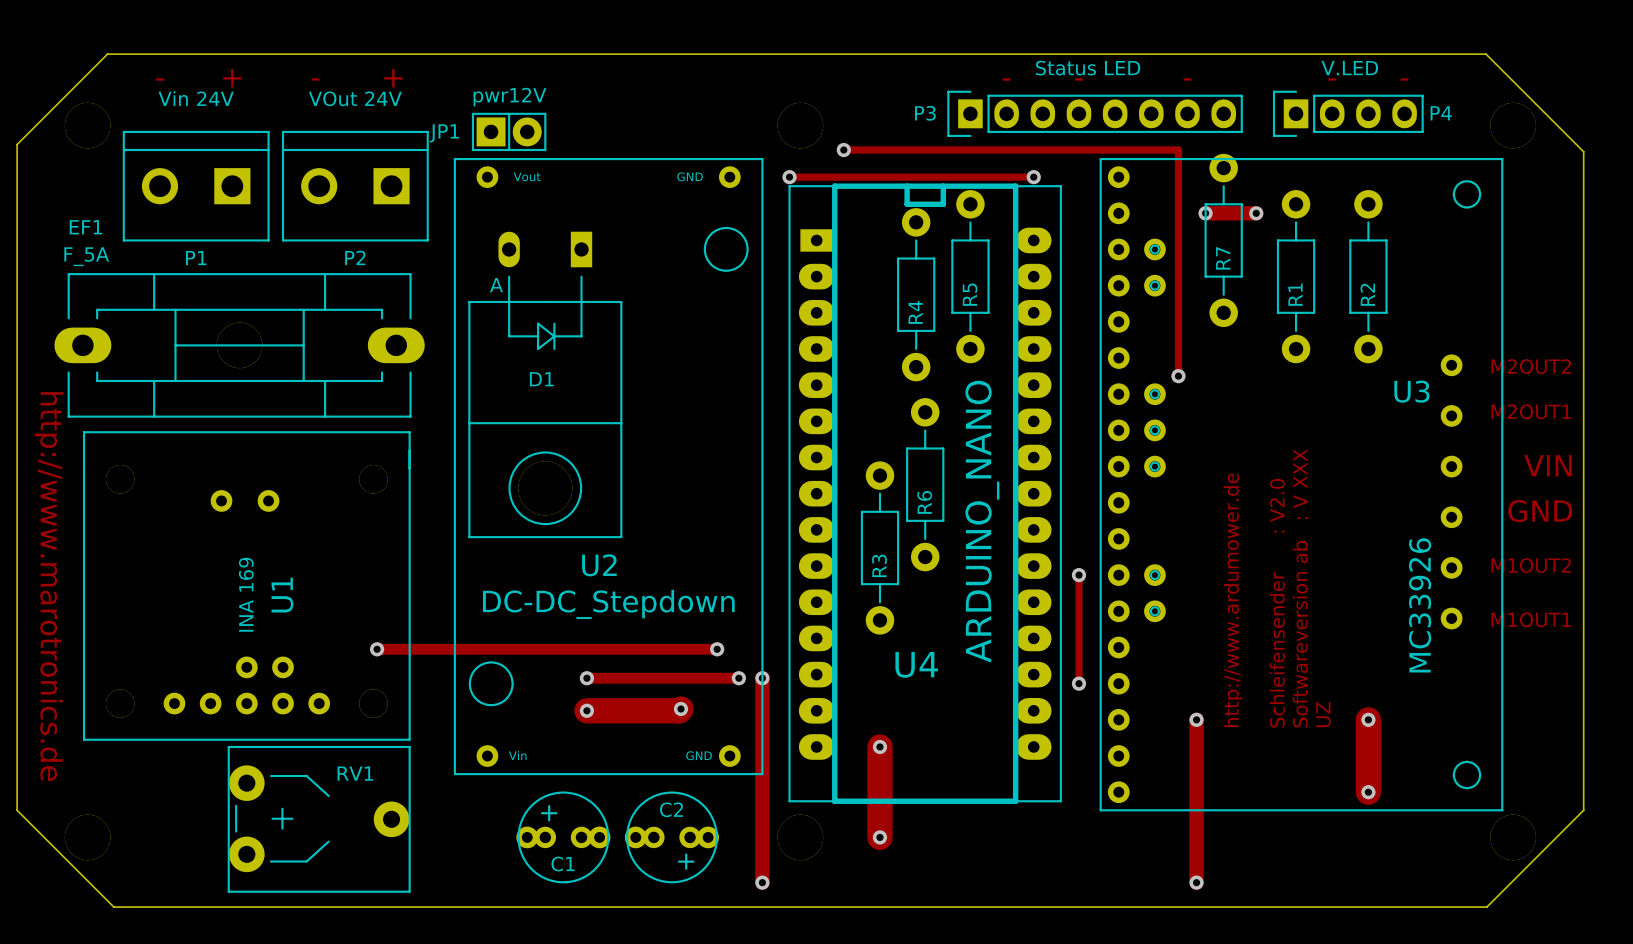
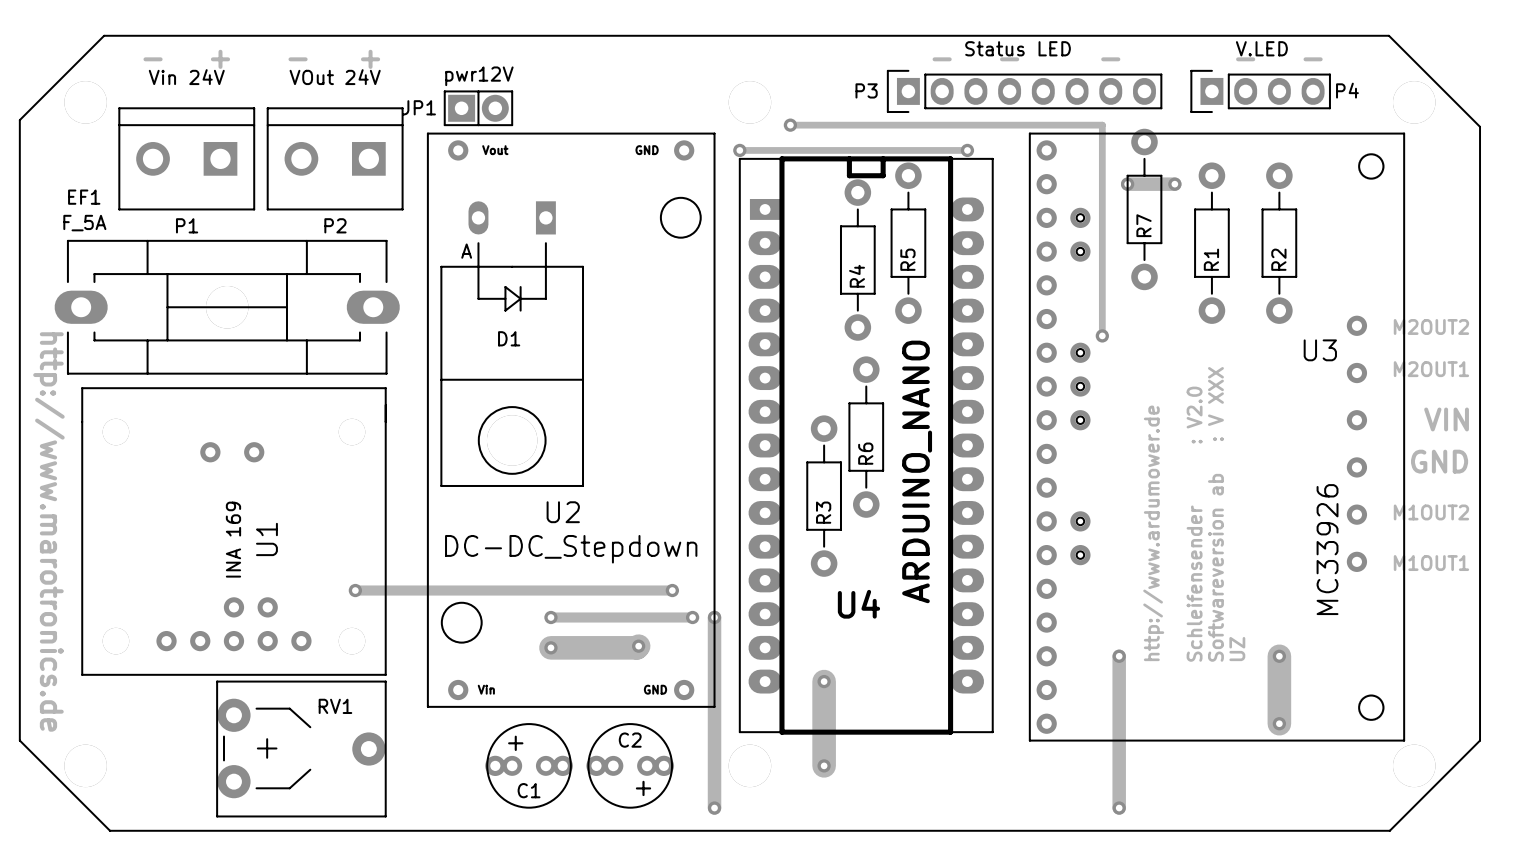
track: (1078, 575) (1078, 683) -> none
via: (1078, 575) -> none
via: (1078, 683) -> none

